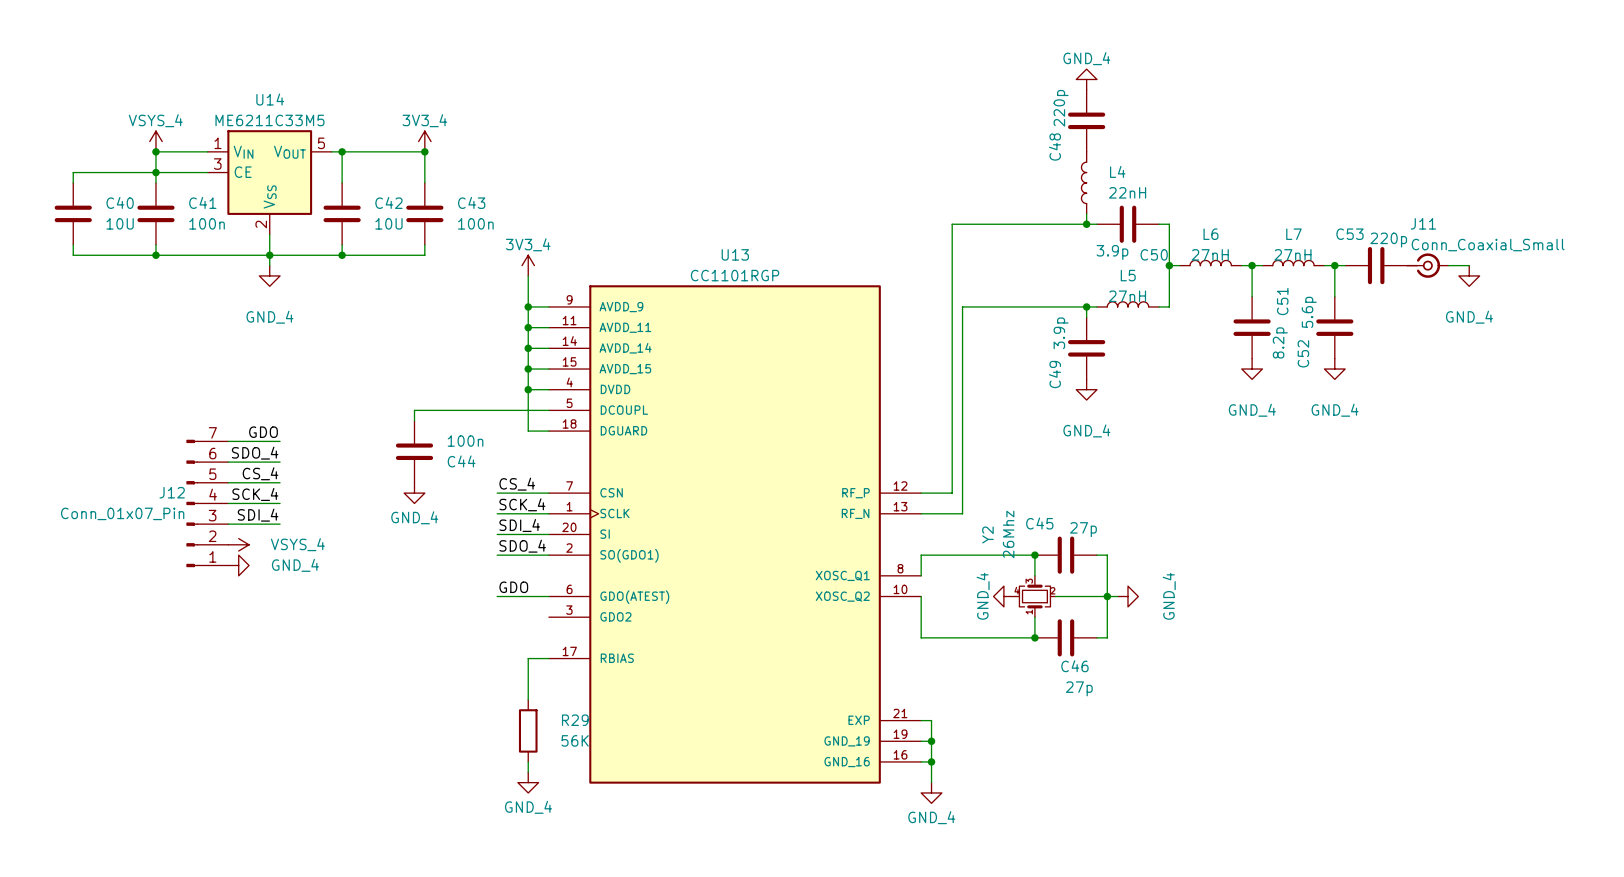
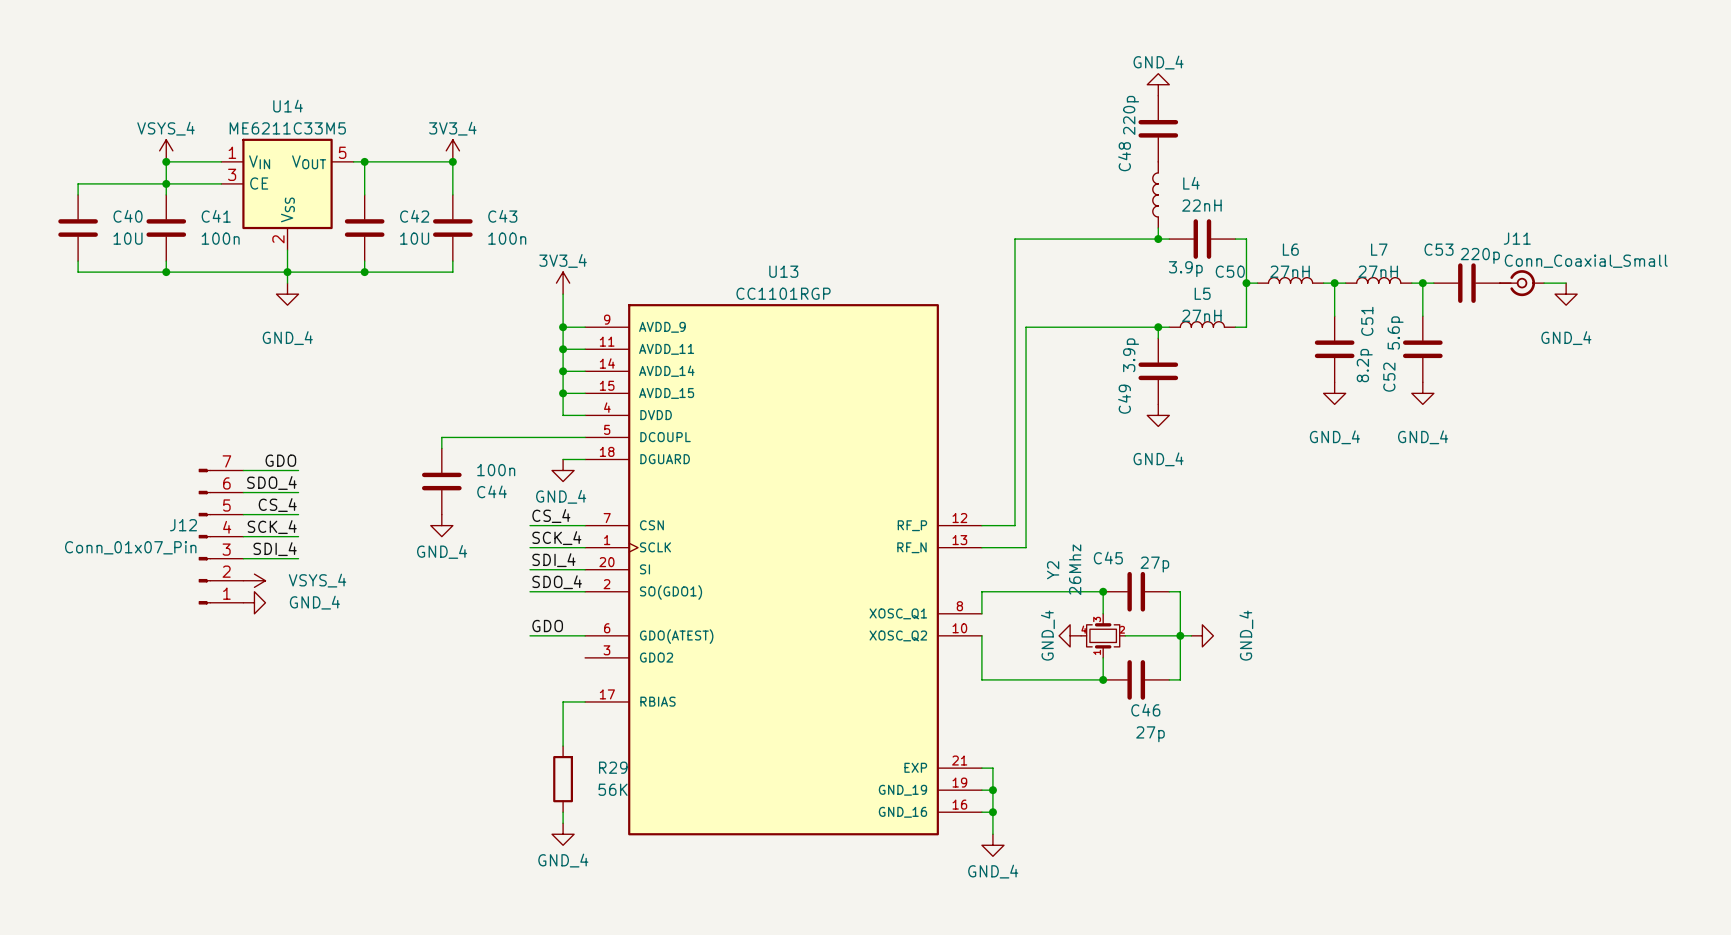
wire: (528, 389) (528, 431) -> none
junction: (528, 389) -> none
power symbol: none -> GND_4 (563, 470)

